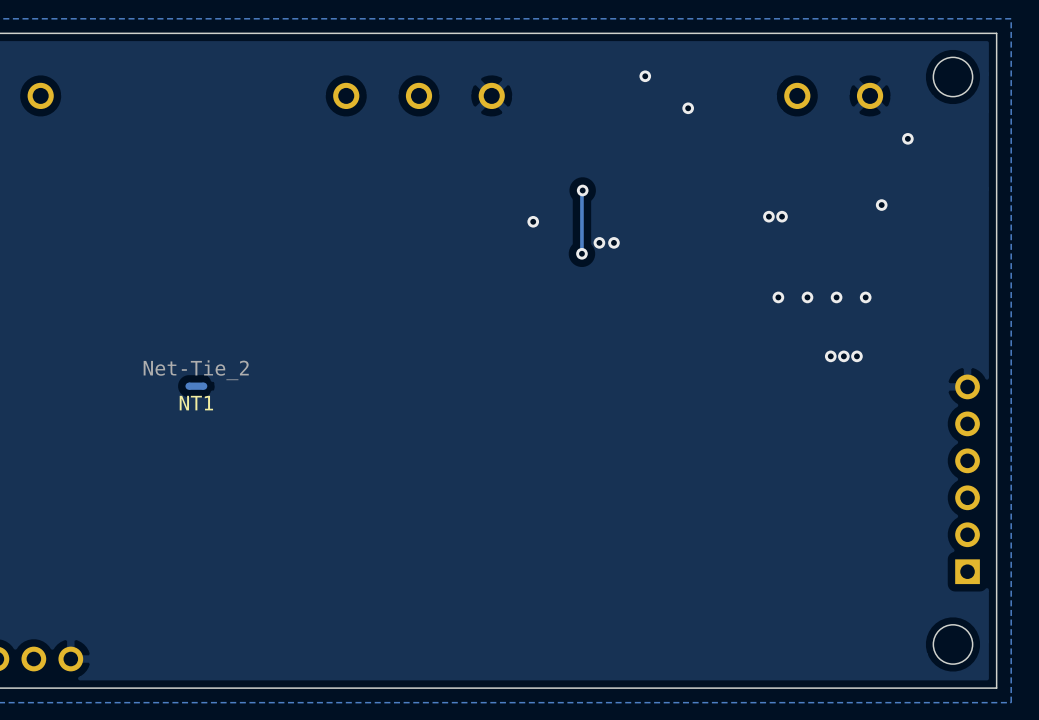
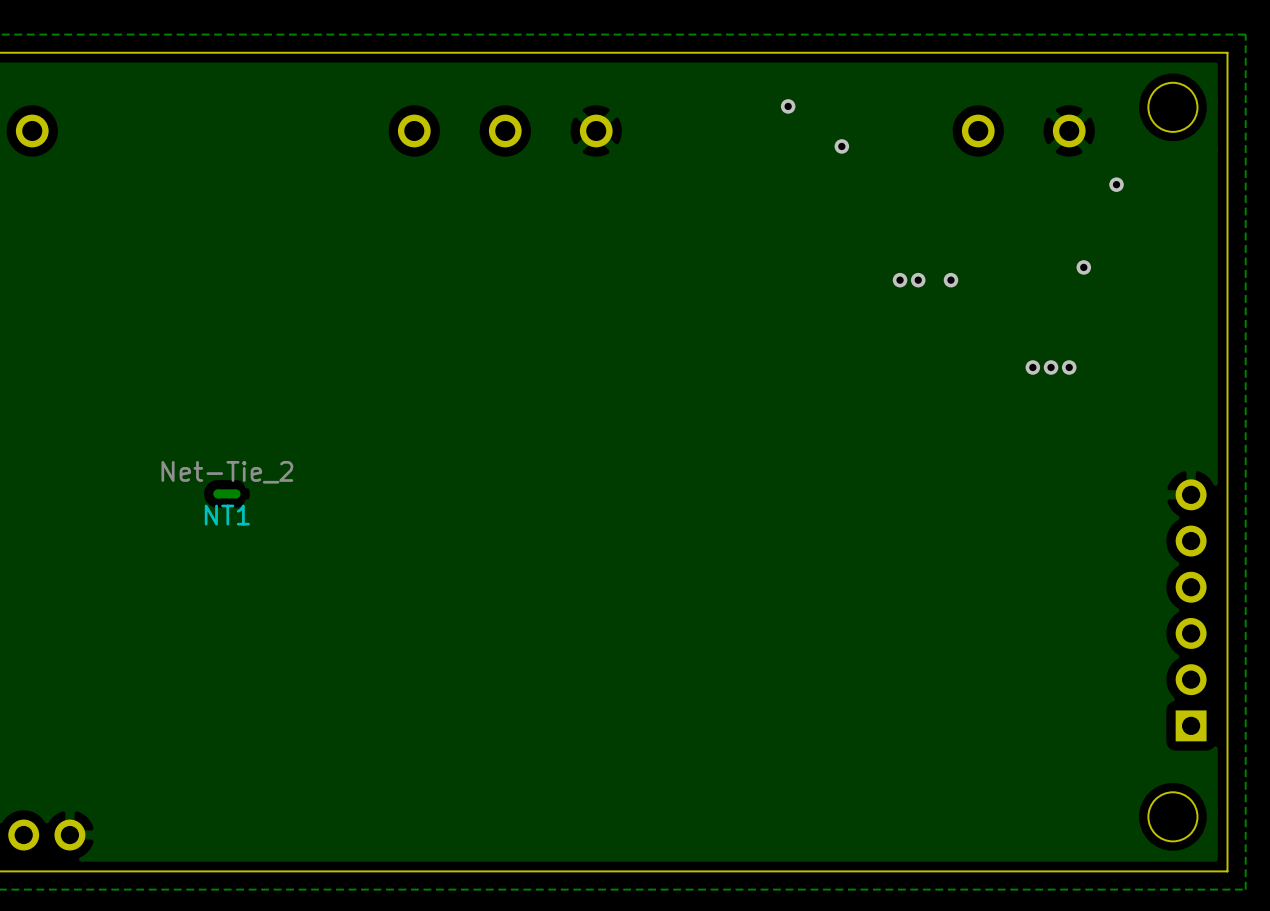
track: (582, 190) (581, 253) -> none
via: (582, 190) -> none
via: none -> (900, 280)
via: none -> (918, 280)
via: none -> (950, 280)
via: (768, 216) -> none
via: (782, 216) -> none
via: (533, 221) -> none
via: (599, 242) -> none
via: (613, 242) -> none
via: (581, 253) -> none
via: none -> (1032, 367)
via: none -> (1051, 367)
via: none -> (1069, 367)
via: (778, 297) -> none
via: (807, 297) -> none
via: (836, 297) -> none
via: (865, 297) -> none
via: (830, 356) -> none
via: (843, 356) -> none
via: (856, 356) -> none

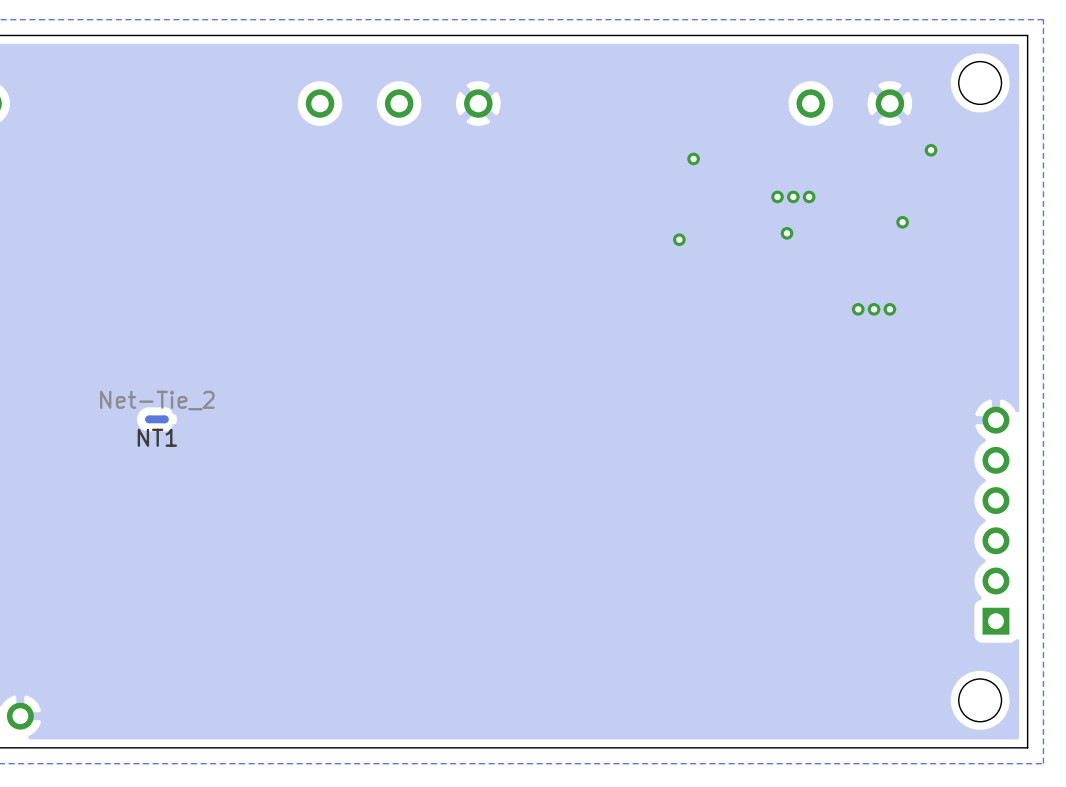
via: (788, 106) -> none
via position: (841, 146) -> (693, 158)
via: none -> (777, 196)
via: none -> (793, 196)
via: none -> (809, 196)
via: (900, 280) -> none
via: (918, 280) -> none
via: none -> (679, 239)

